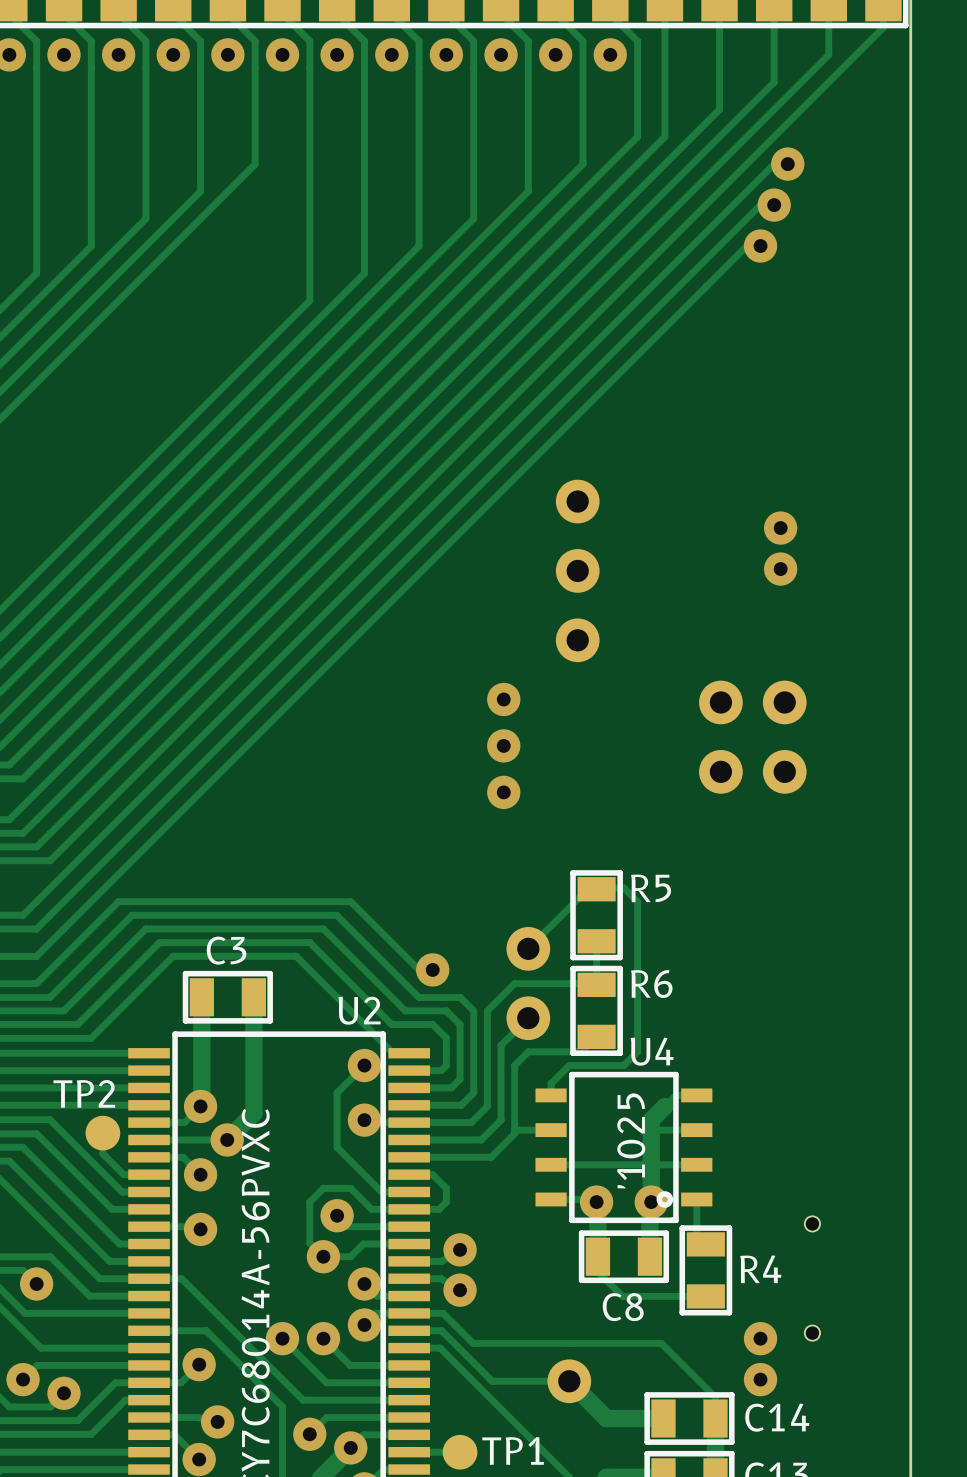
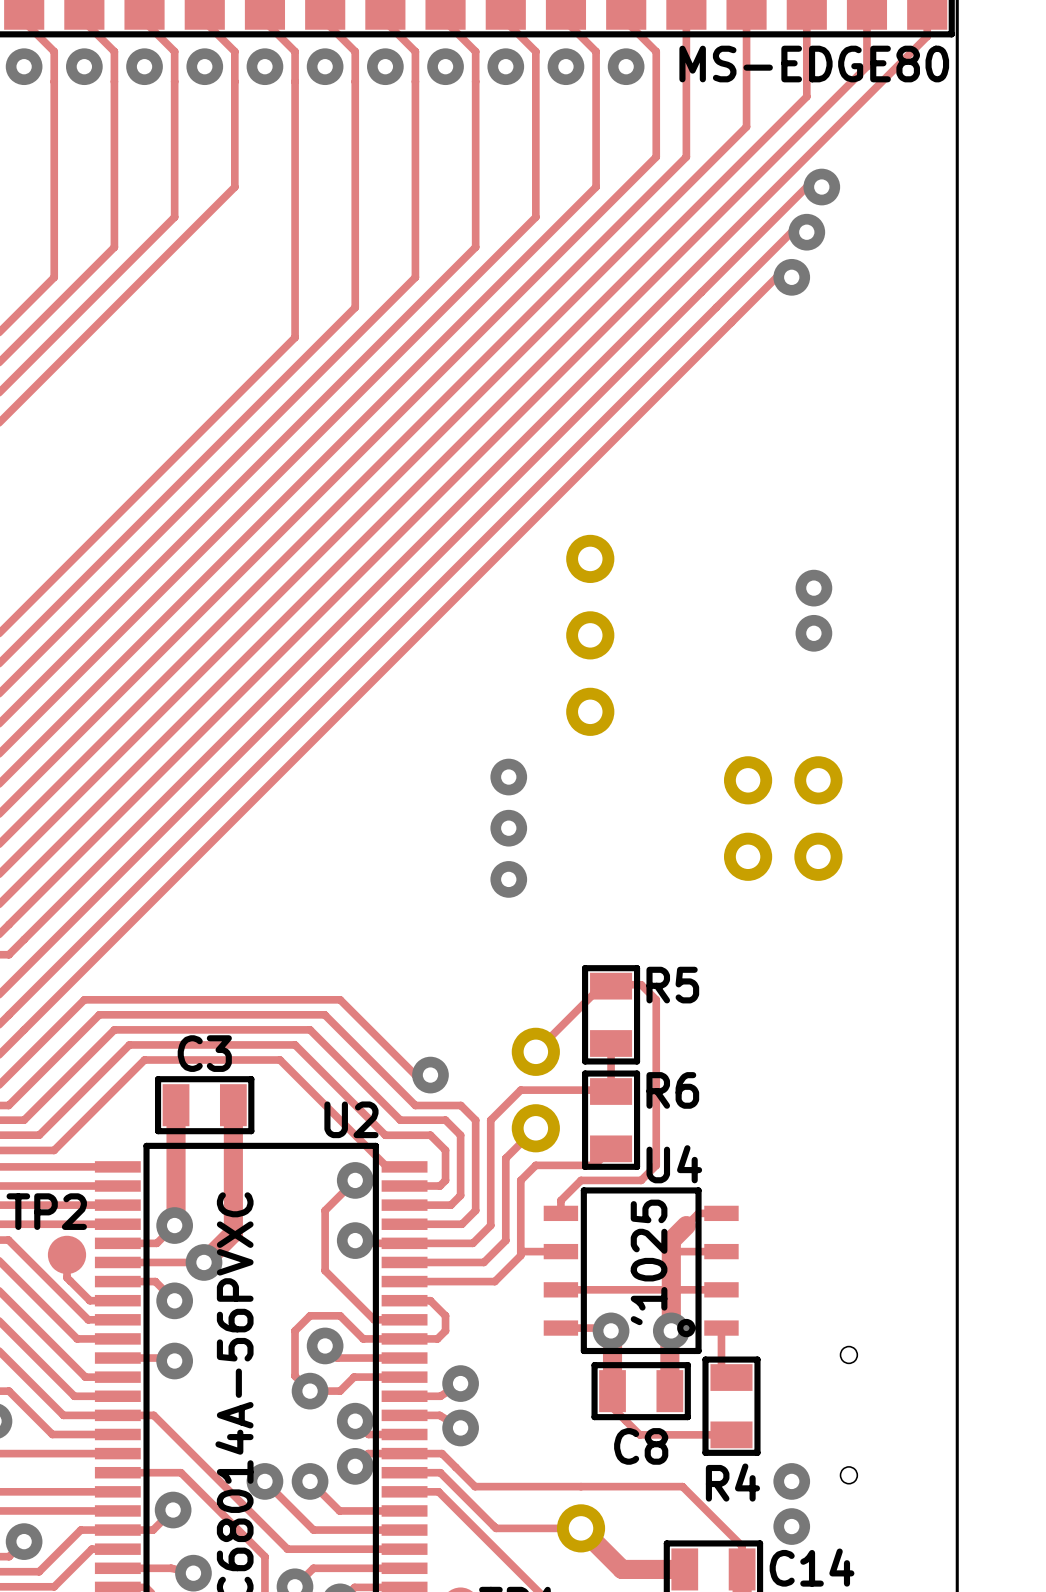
part value: none -> MS-EDGE80 (814, 64)
R4 name position: R4 (760, 1269) -> R4 (732, 1482)

